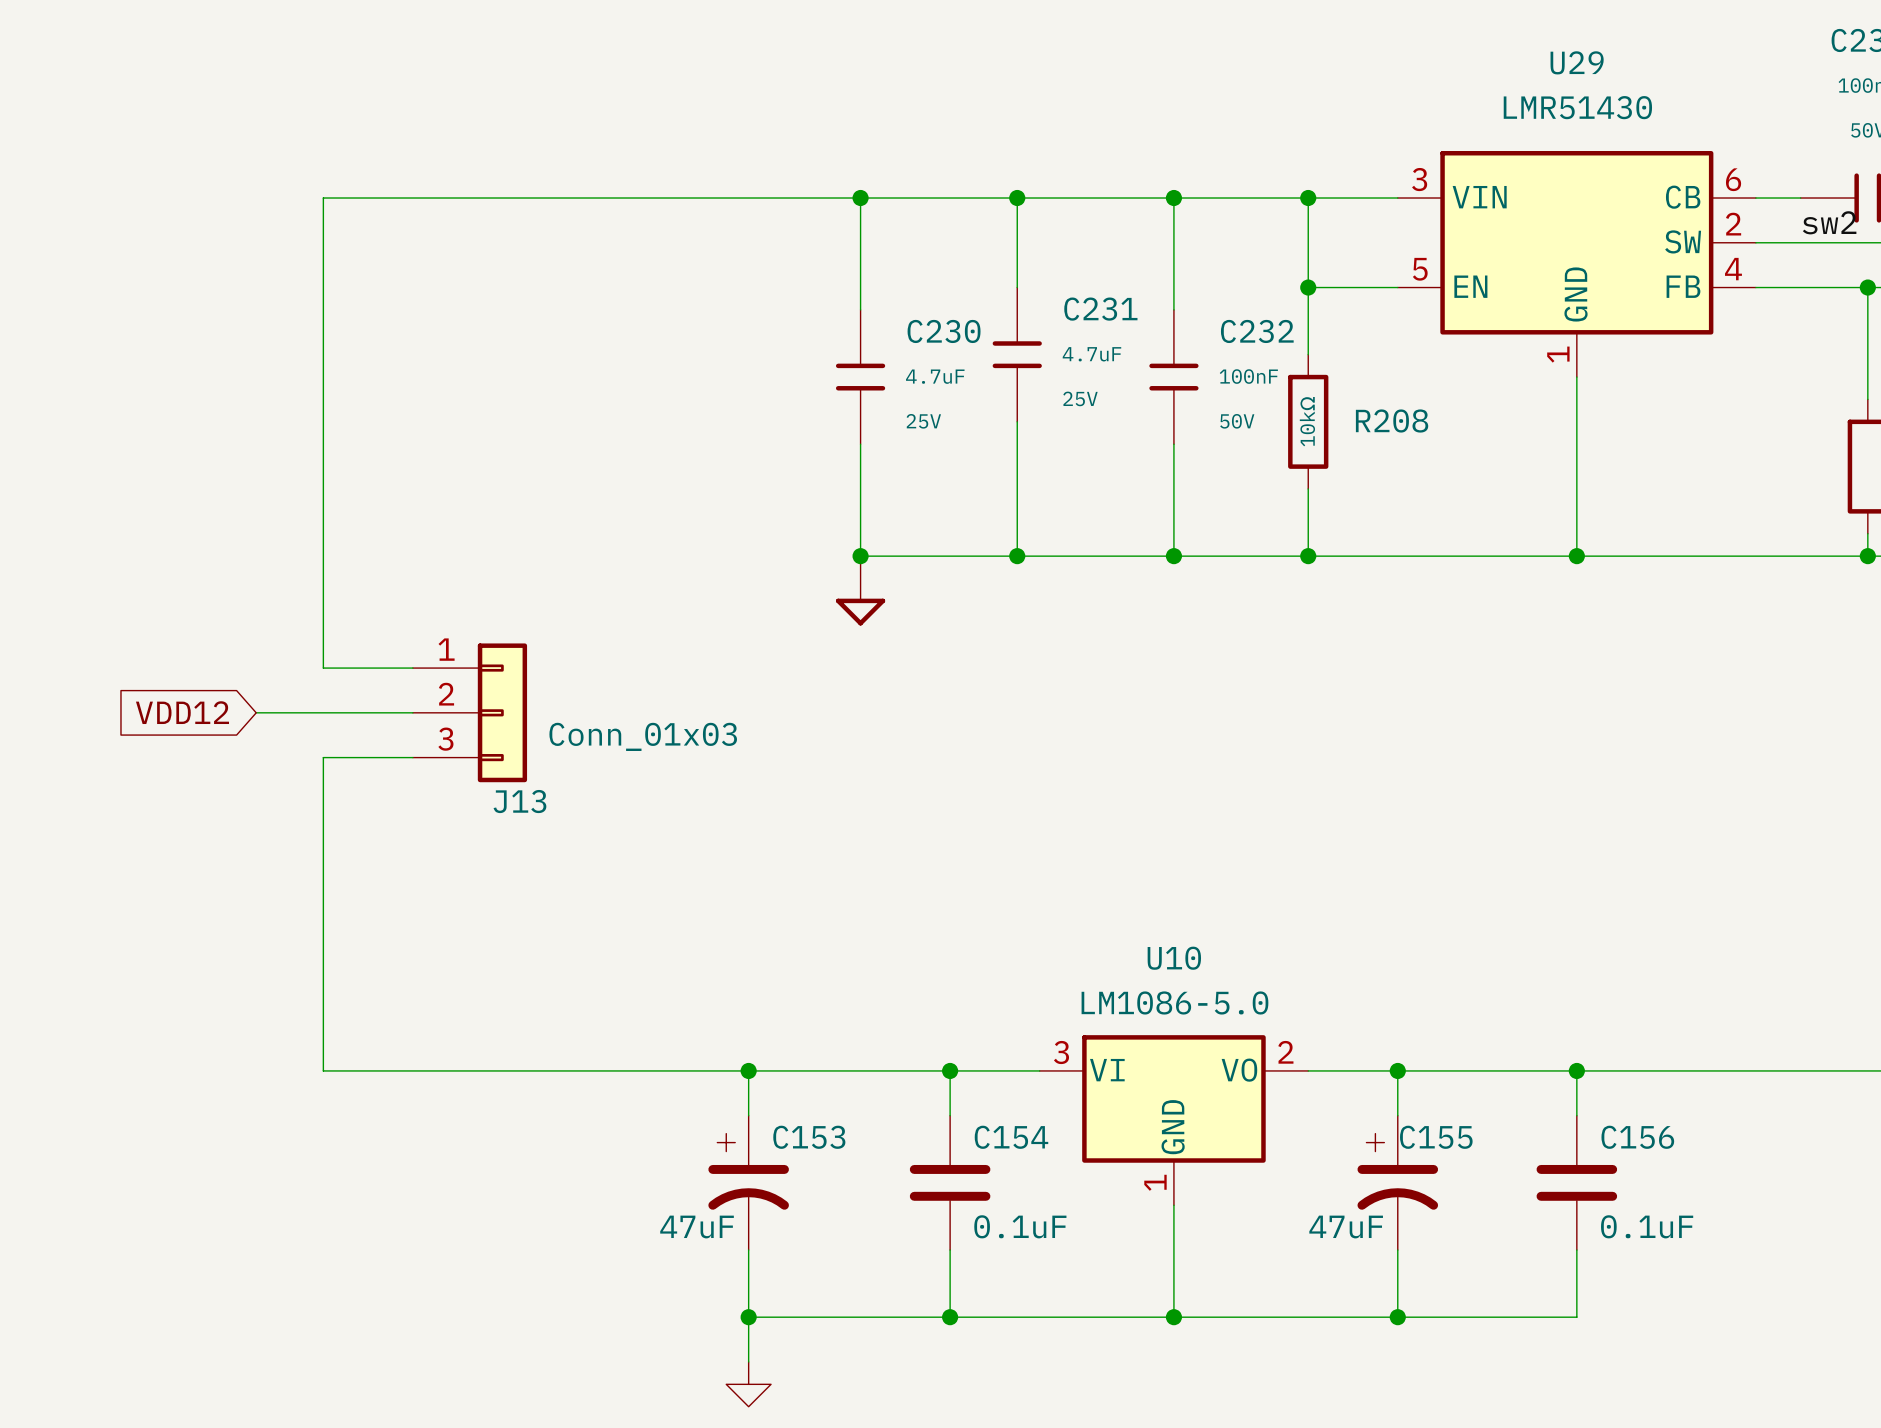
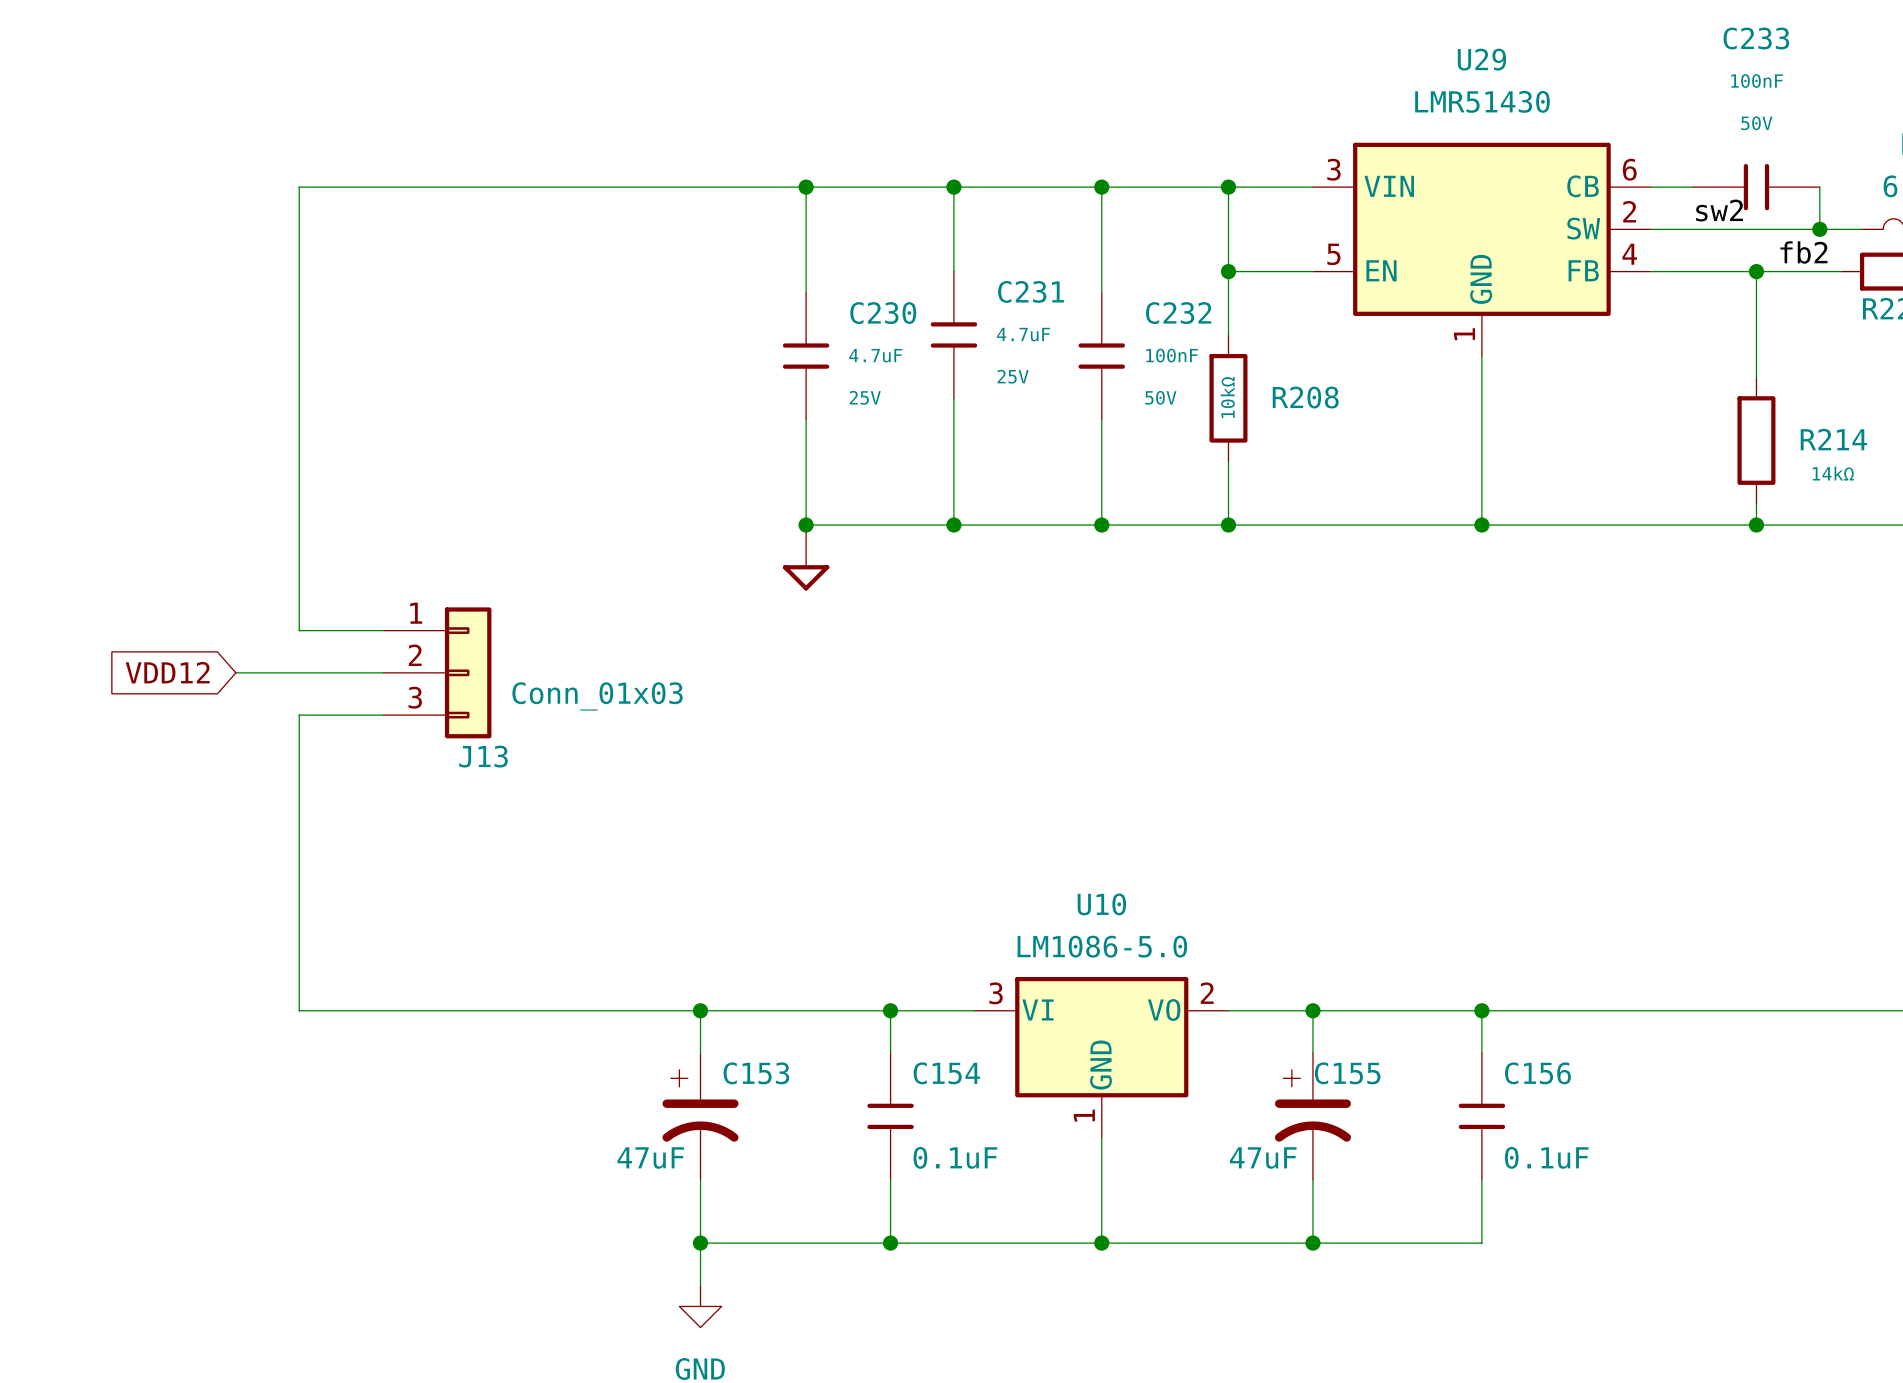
C154 symbol: [909, 1115, 991, 1251] -> [867, 1053, 914, 1180]
C156 symbol: [1536, 1115, 1618, 1251] -> [1458, 1053, 1506, 1180]

